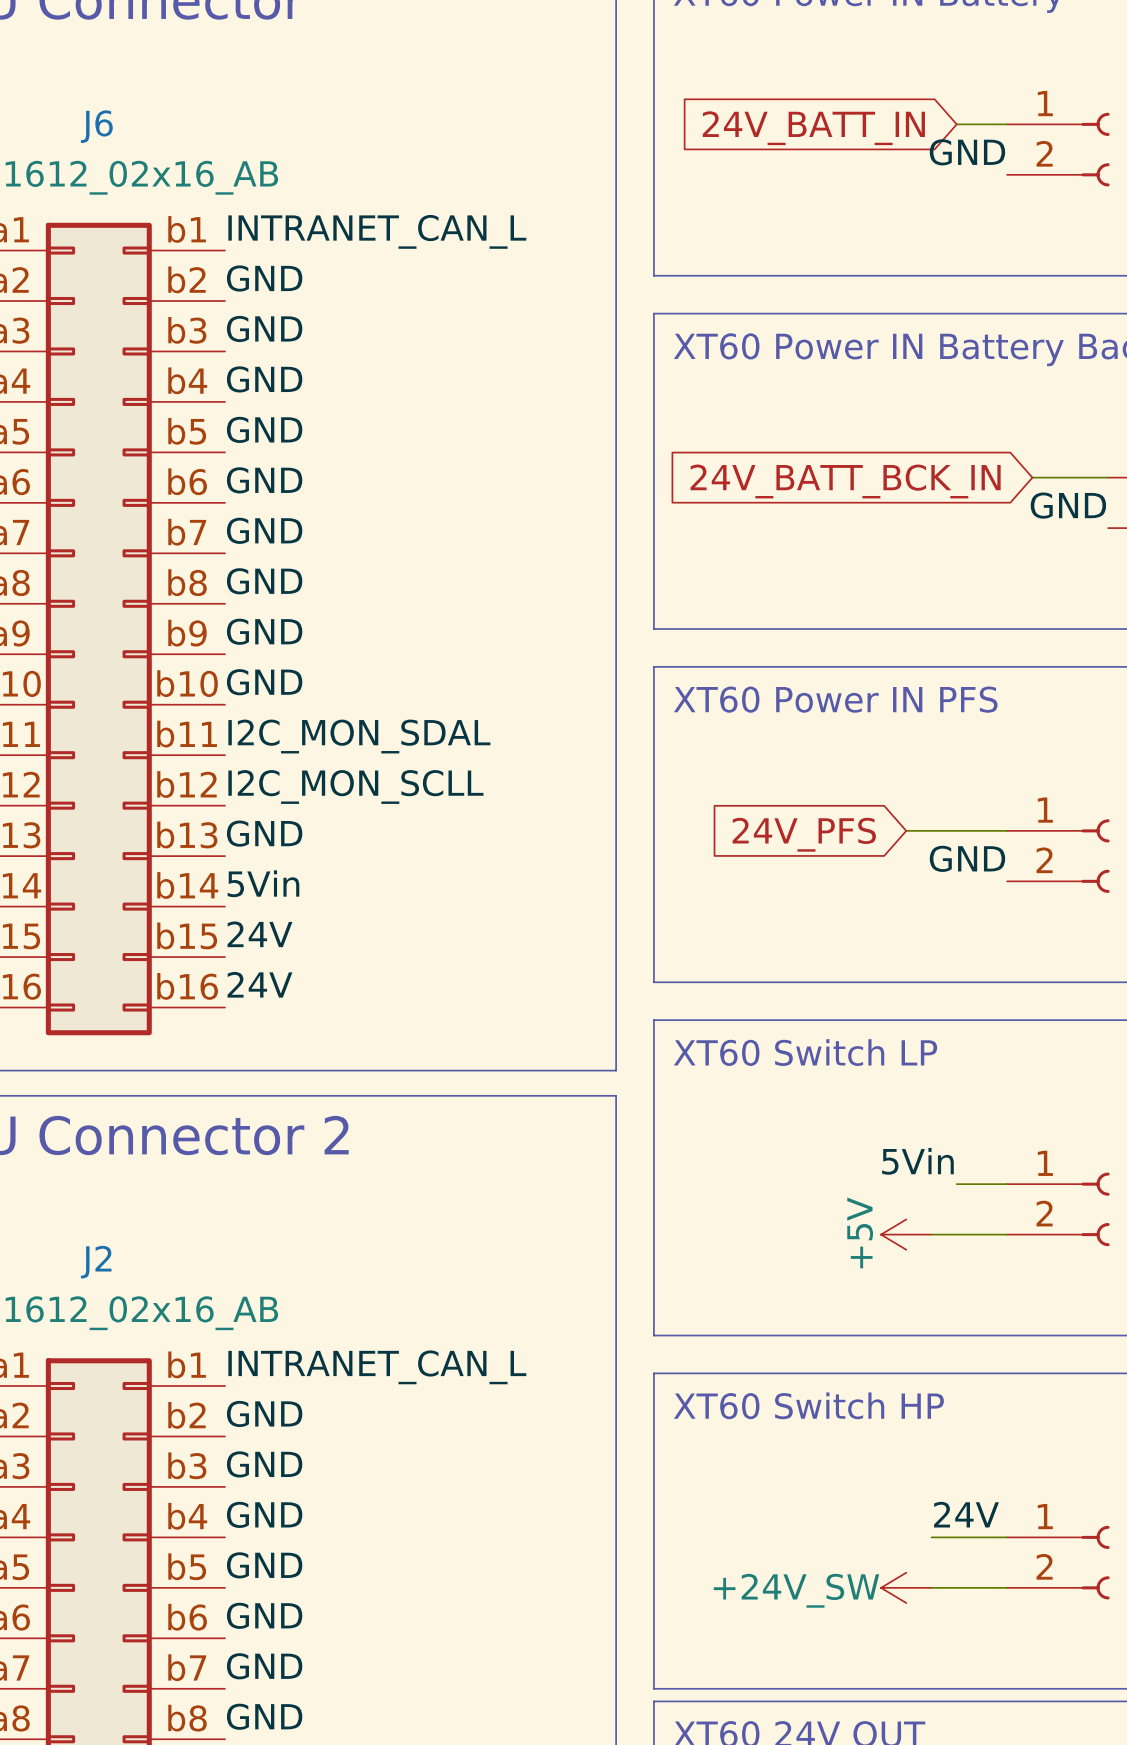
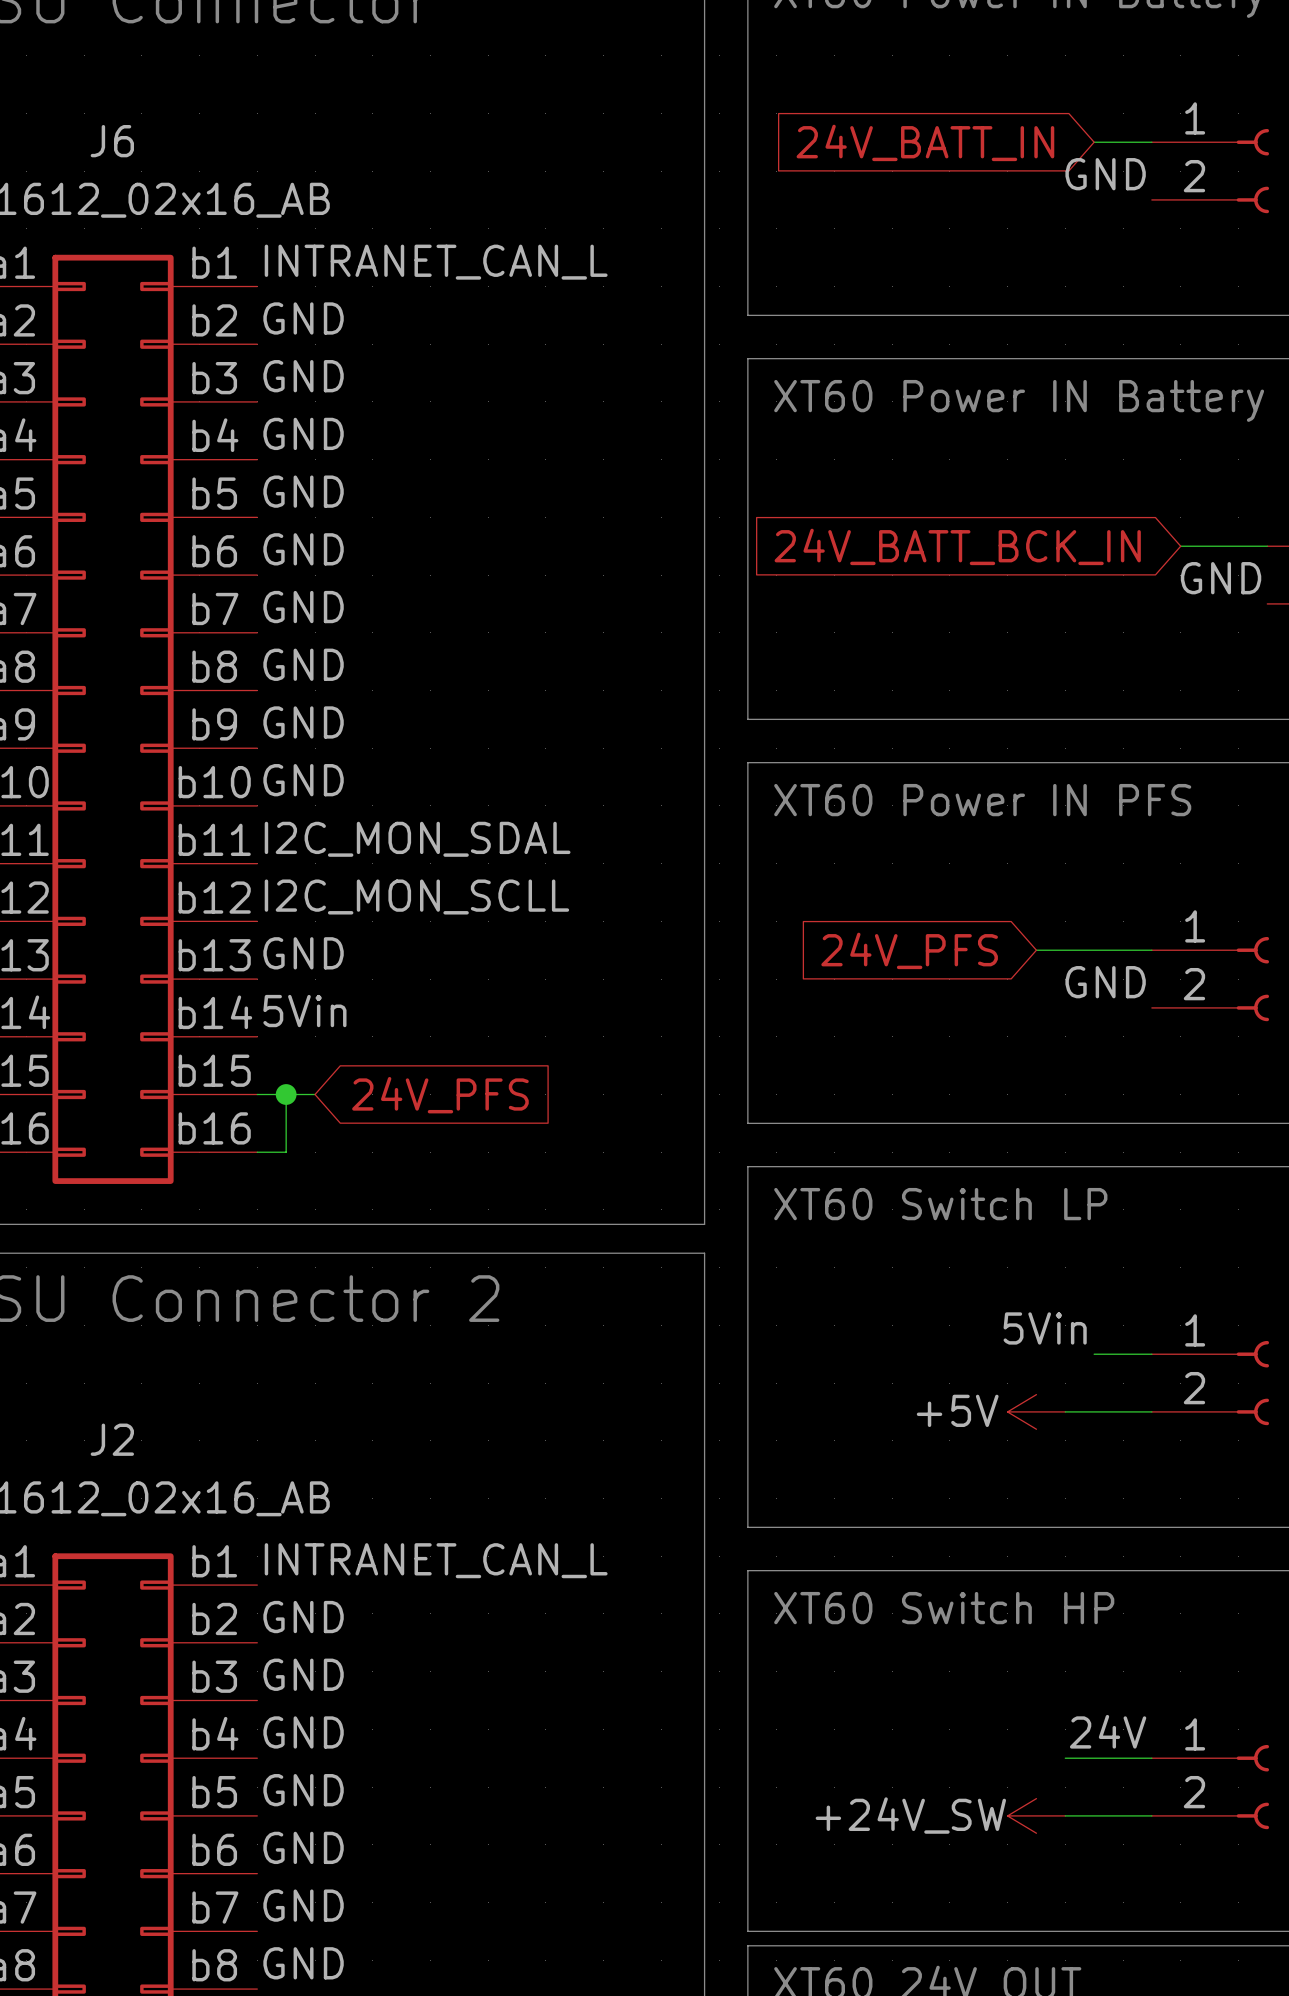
label: 24V (259, 934) -> none
wire: none -> (257, 1094) (315, 1094)
wire: none -> (286, 1094) (286, 1152) (257, 1152)
junction: none -> (286, 1094)
global label: none -> 24V_PFS (440, 1095)
label: 24V (259, 984) -> none
power symbol text rotation: 0° (860, 1232) -> 90° clockwise (957, 1410)

